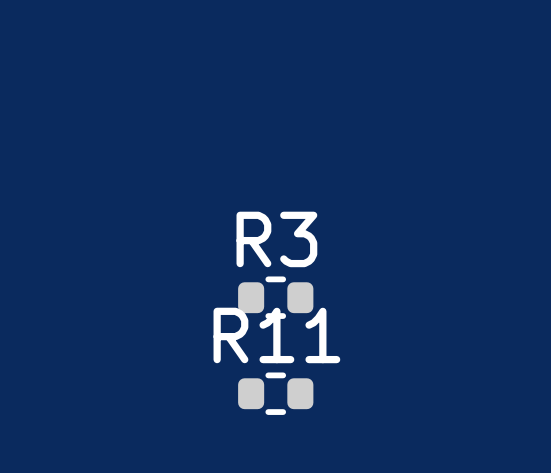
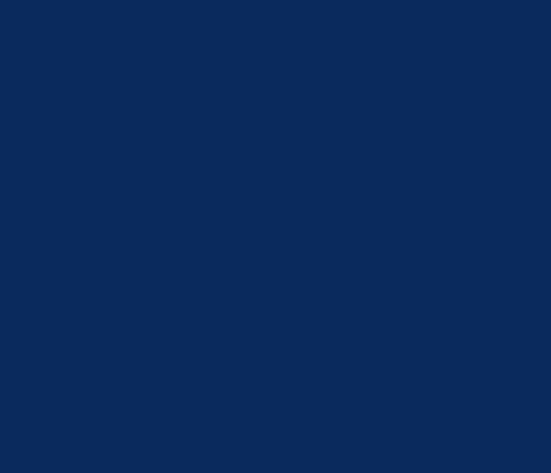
R3: (275, 297) -> none
R11: (275, 393) -> none

